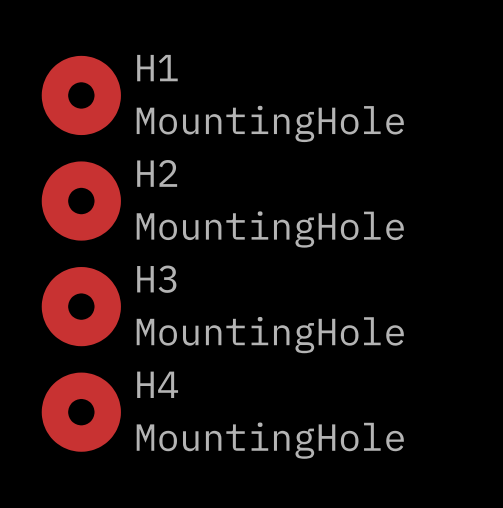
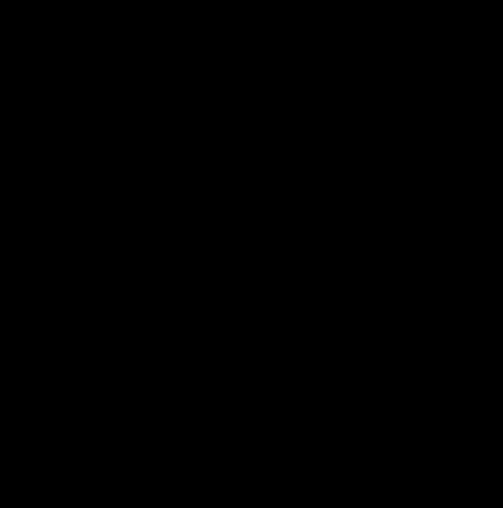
H1: MountingHole (81, 95) -> none
H2: MountingHole (81, 201) -> none
H3: MountingHole (81, 306) -> none
H4: MountingHole (81, 412) -> none

